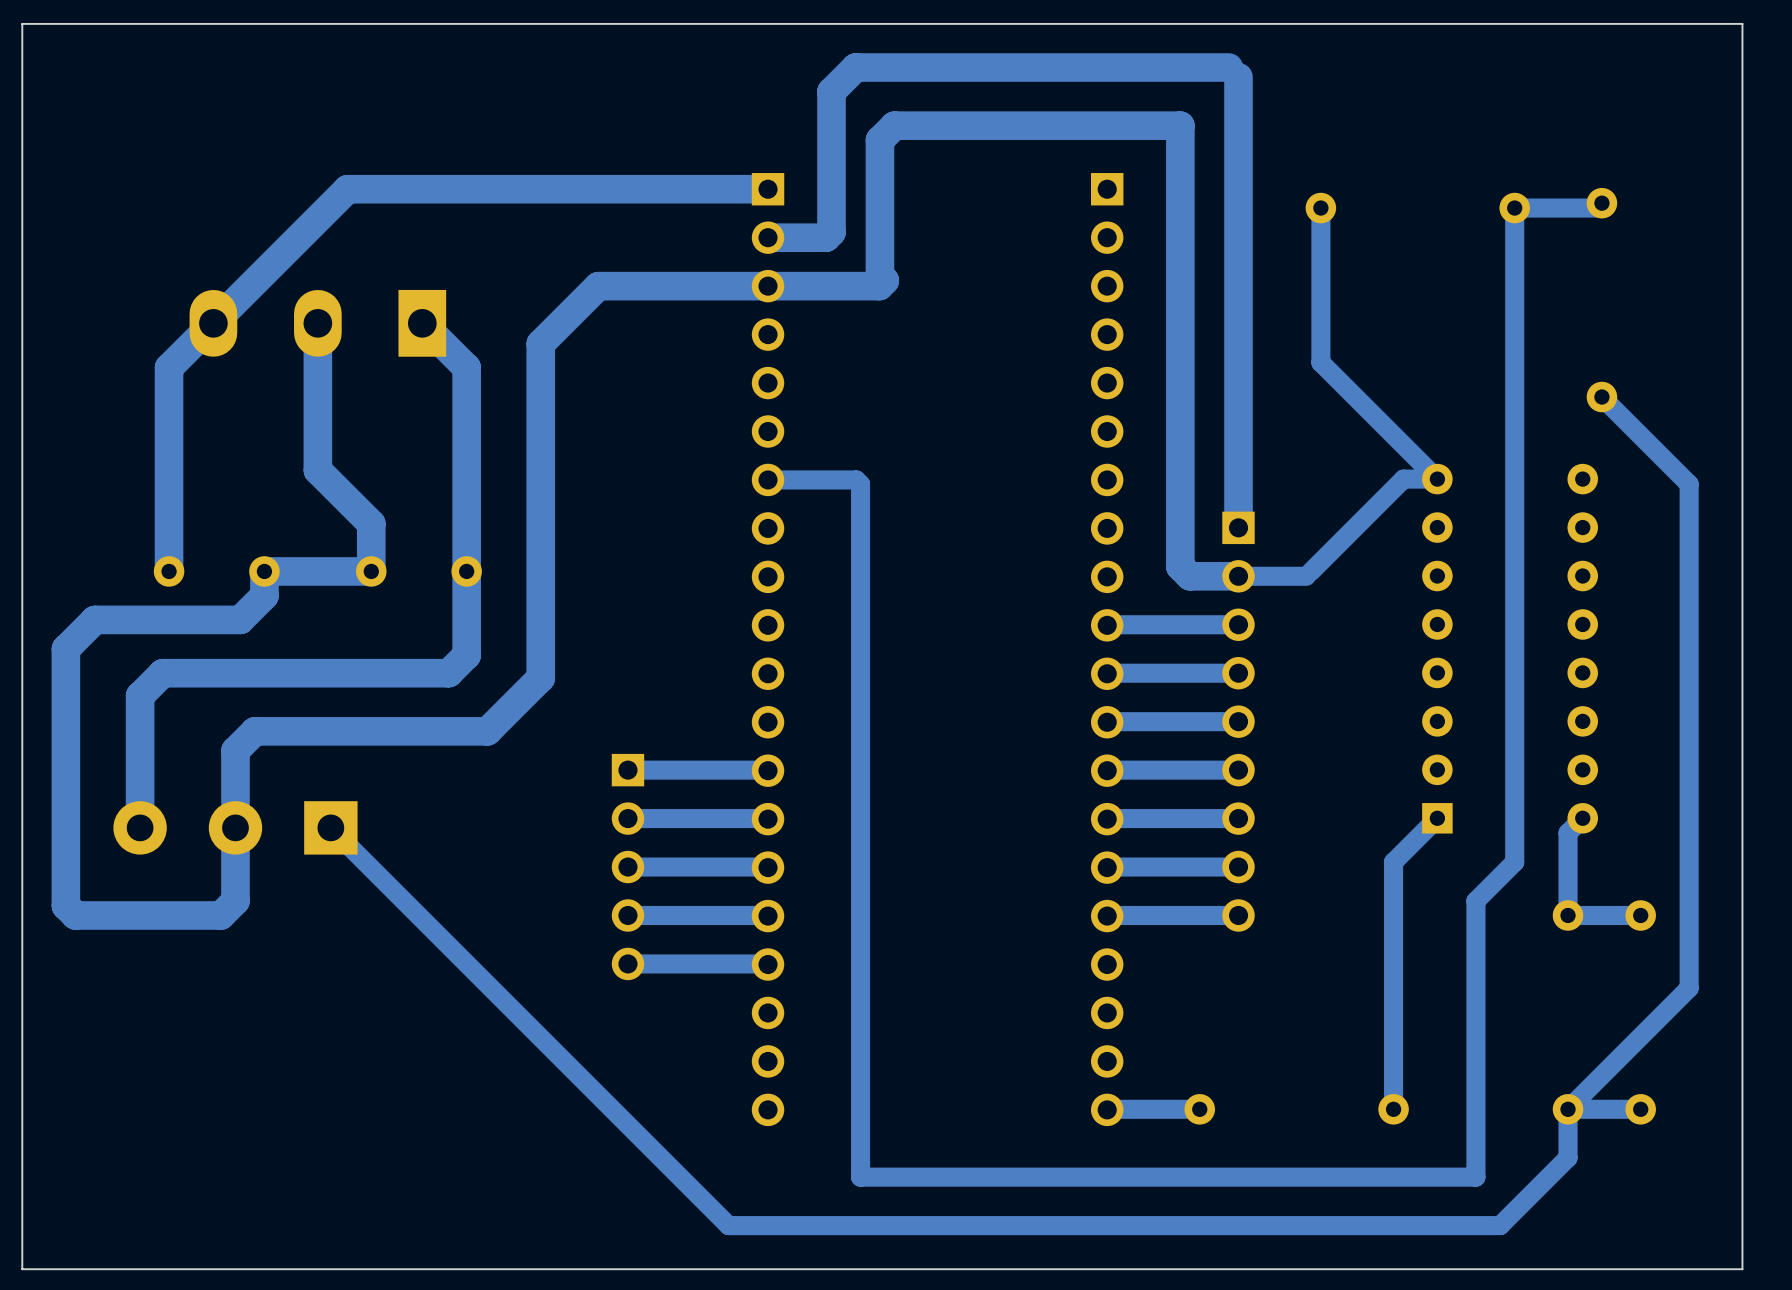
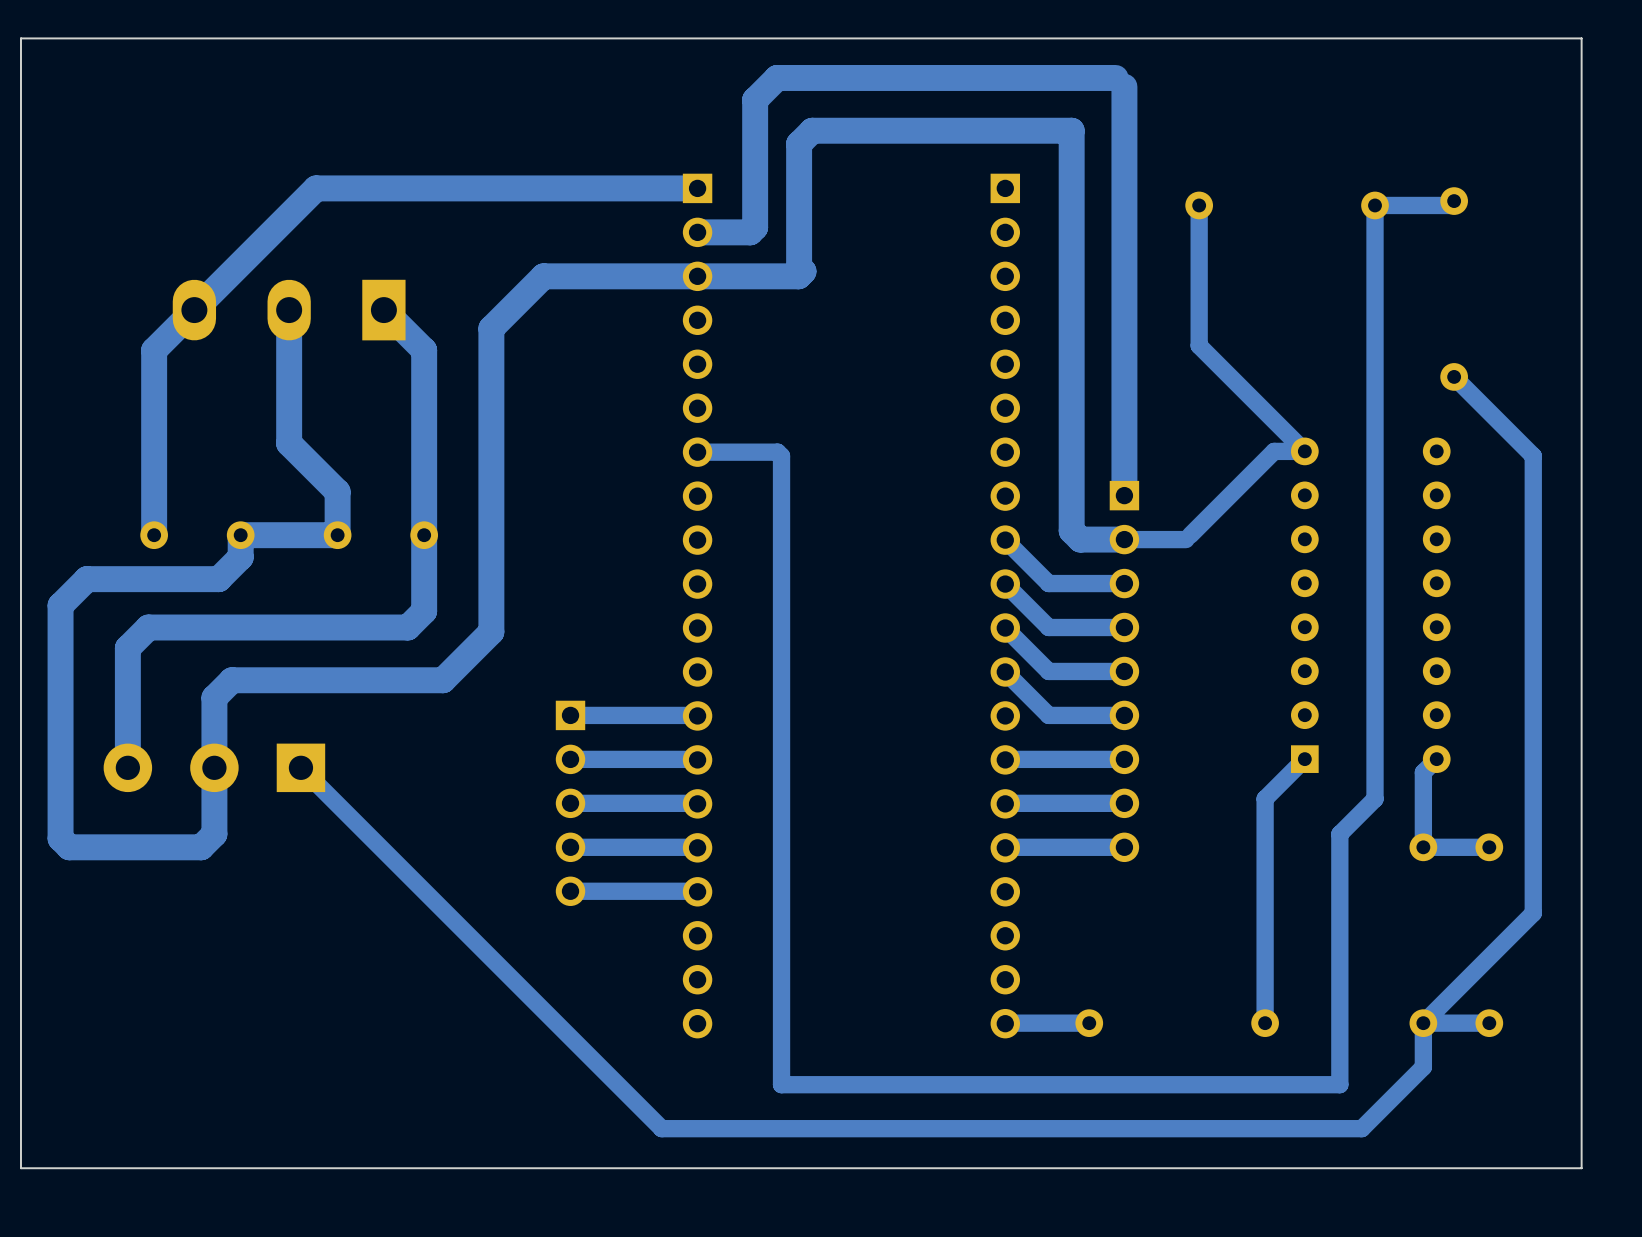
track: (1155, 624) (1107, 624) -> (1048, 583) (1005, 540)
track: (1155, 673) (1107, 673) -> (1048, 627) (1005, 584)
track: (1155, 721) (1107, 721) -> (1048, 671) (1005, 628)
track: (1155, 770) (1107, 770) -> (1048, 715) (1005, 671)

